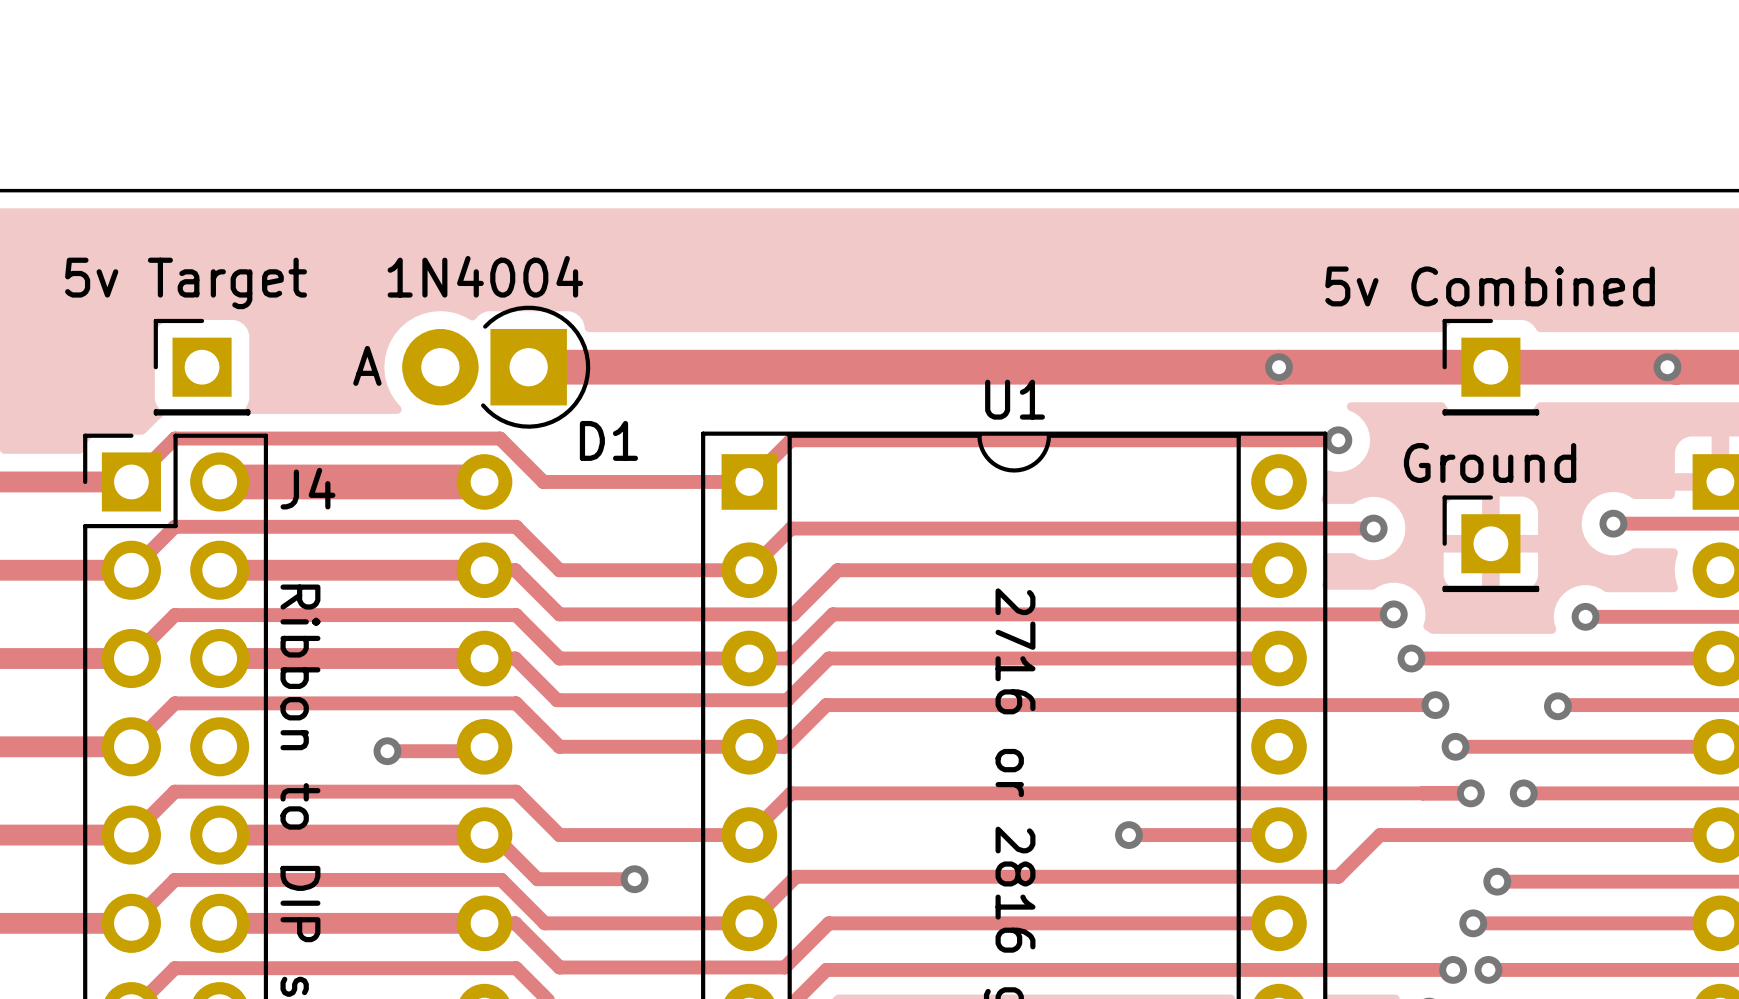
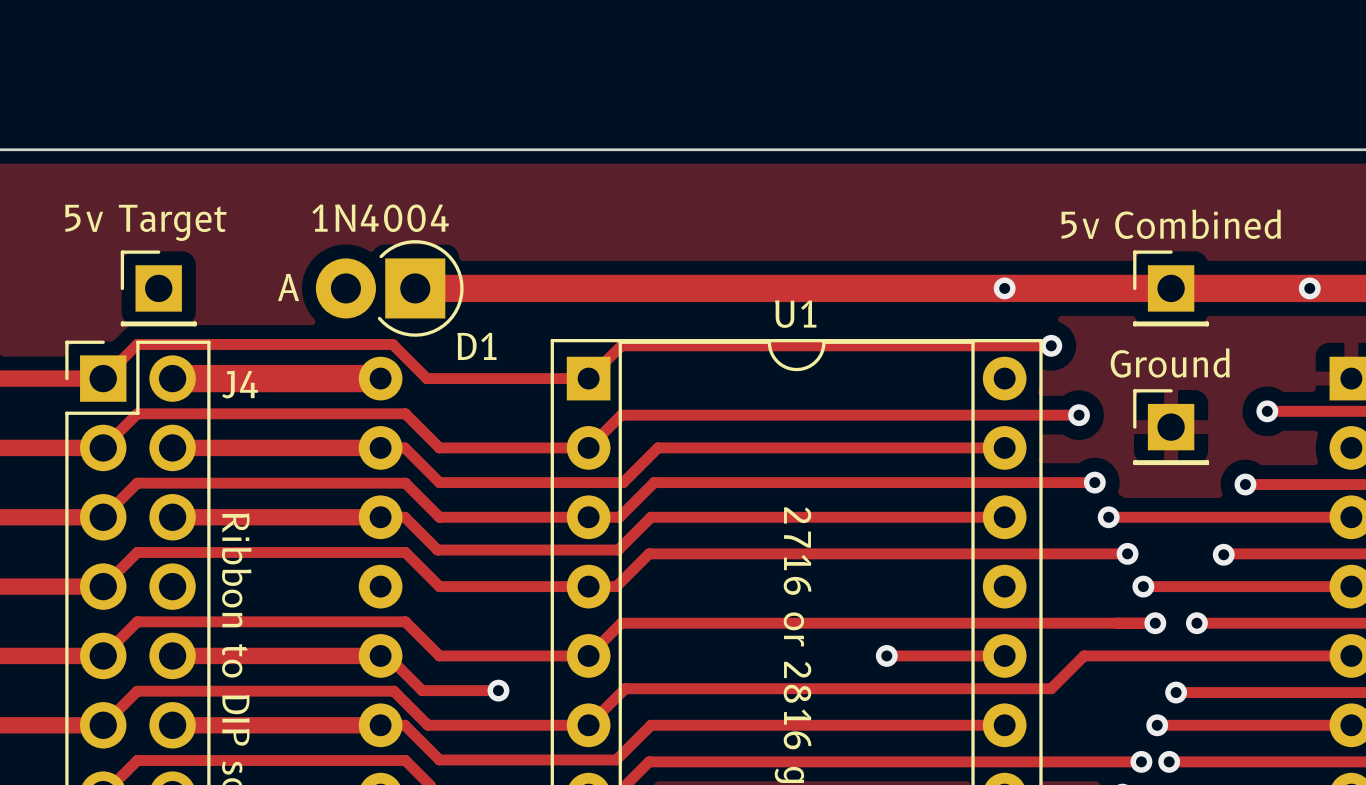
track: (484, 746) (480, 751) (387, 751) -> none
via: (387, 751) -> none

